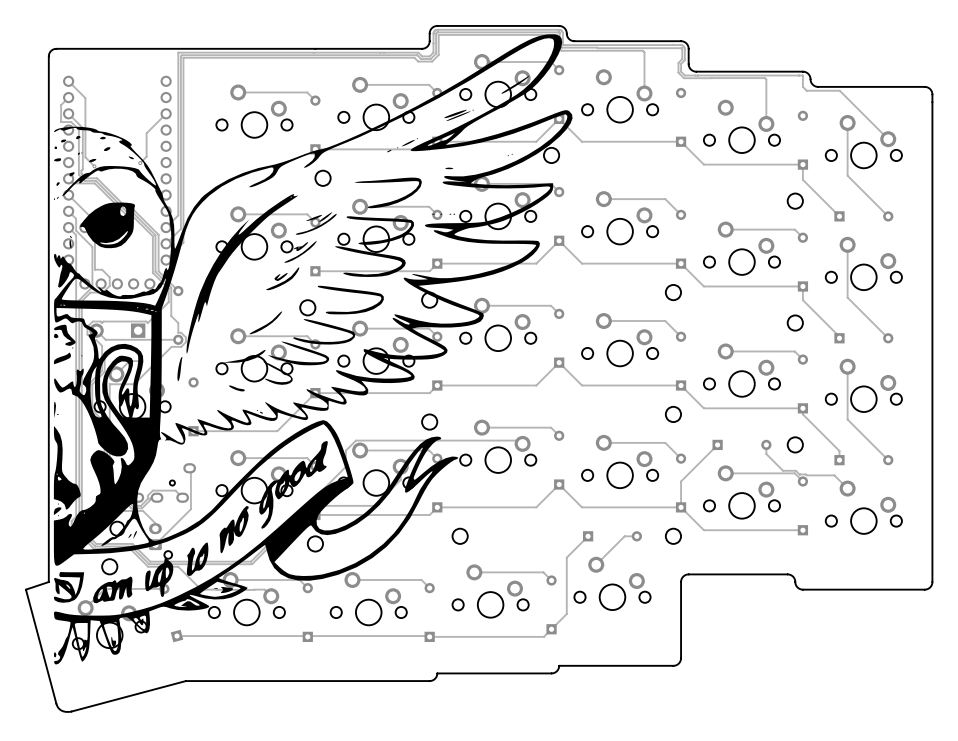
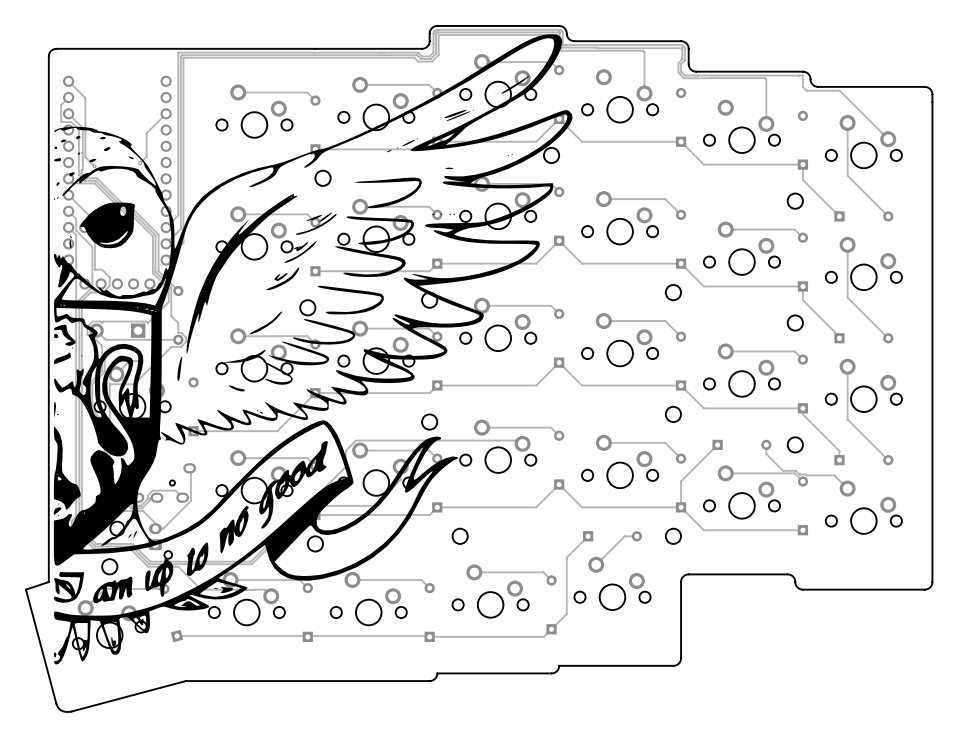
track: (190, 500) (190, 509) (155, 544) -> (190, 500) (163, 528) (155, 528)

